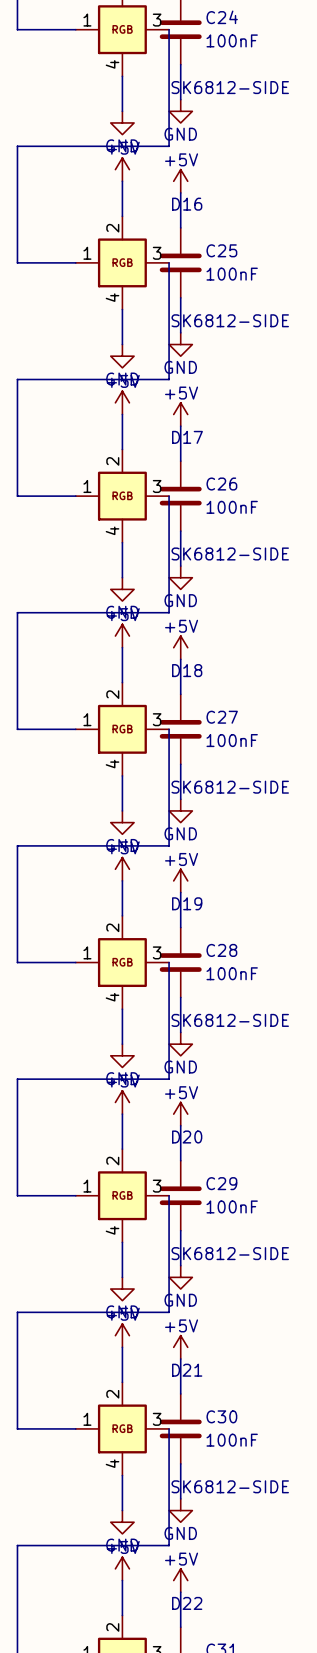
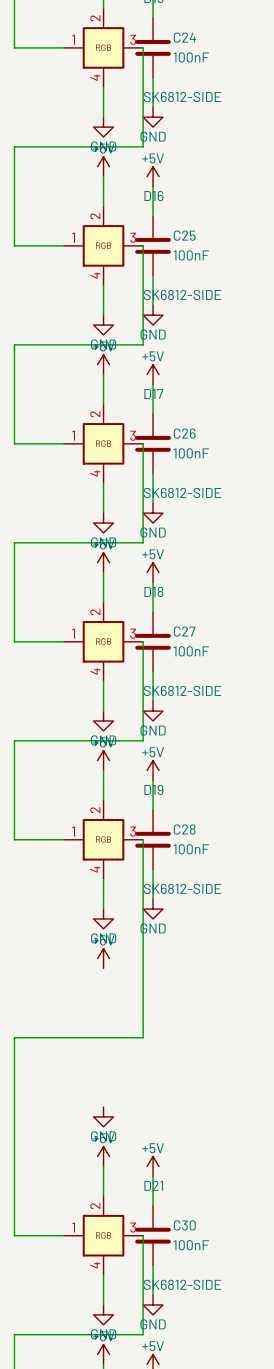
wire: (169, 1079) (17, 1079) (17, 1195) -> (143, 938) (143, 1037) (63, 1037)
wire: (122, 1114) (122, 1149) -> none
power symbol: +5V (180, 1114) -> none
wire: (180, 1125) (180, 1160) -> none
D20: SK6812-SIDE (122, 1195) -> none
wire: (169, 1195) (169, 1312) (17, 1312) -> (14, 1037) (14, 1136)
C29: 100nF (180, 1195) -> none
wire: (180, 1230) (180, 1265) -> none
wire: (122, 1242) (122, 1277) -> none
power symbol: GND (180, 1277) -> none

